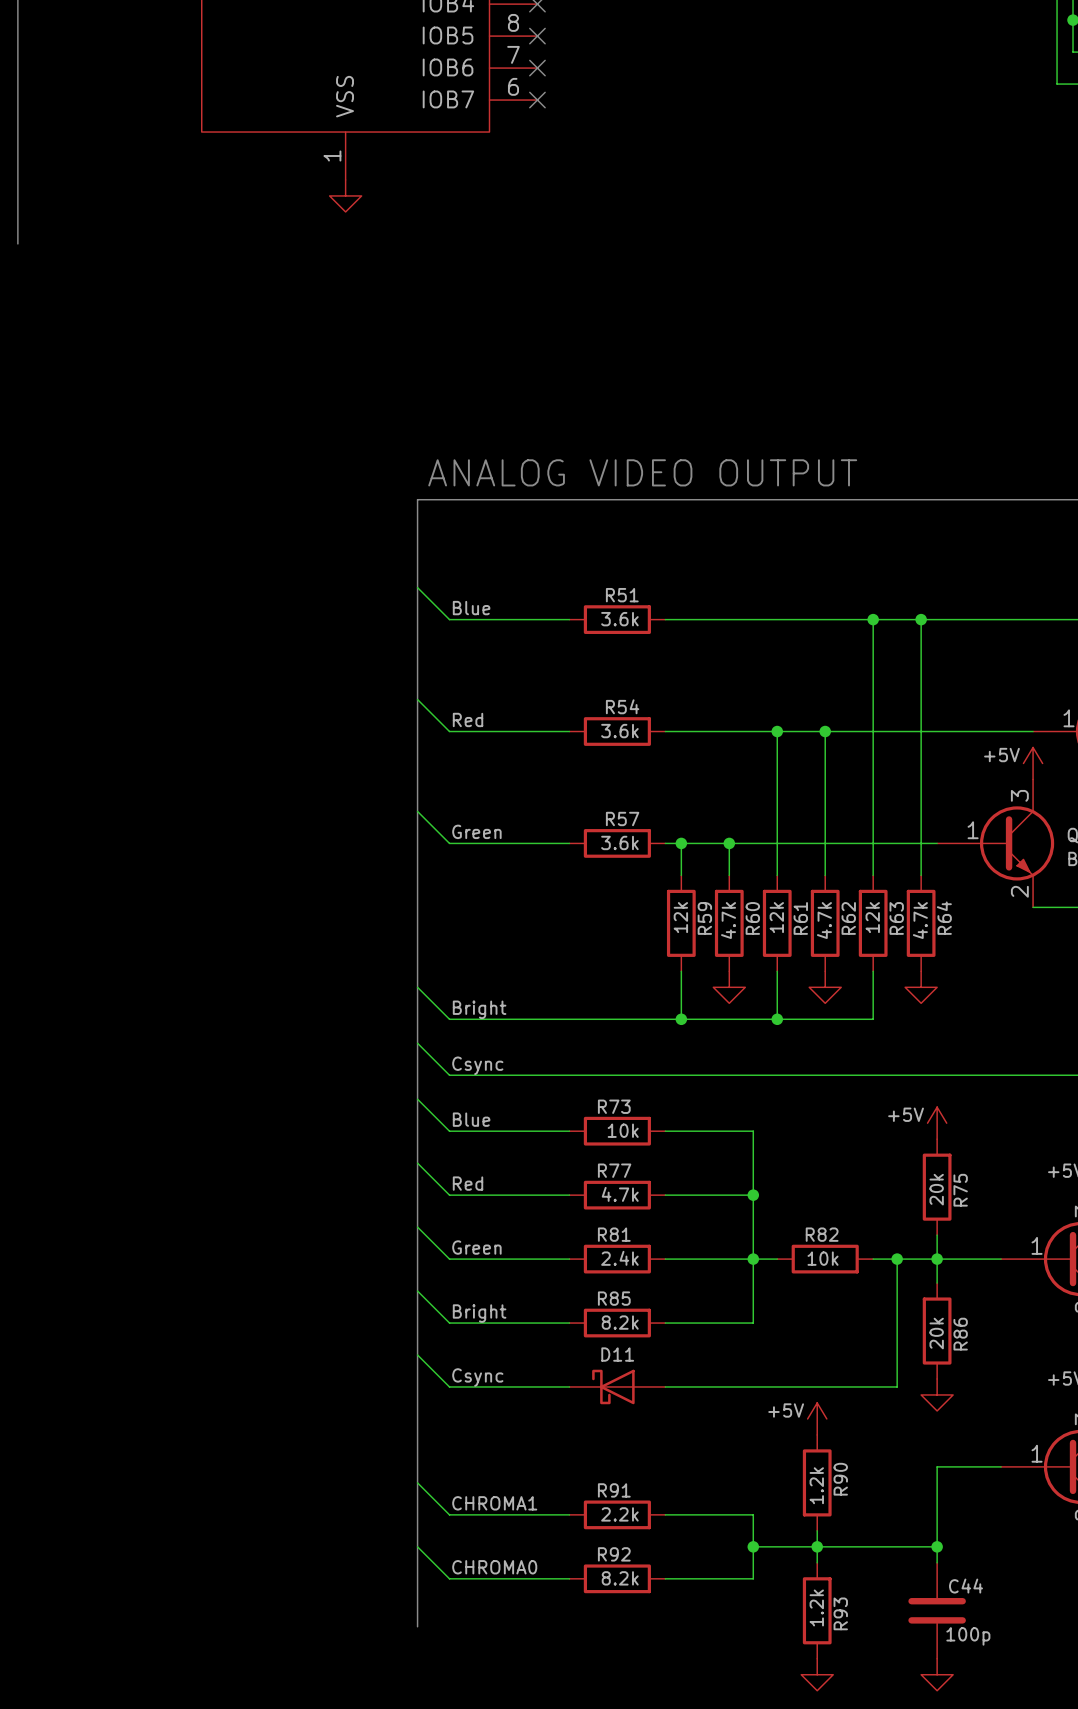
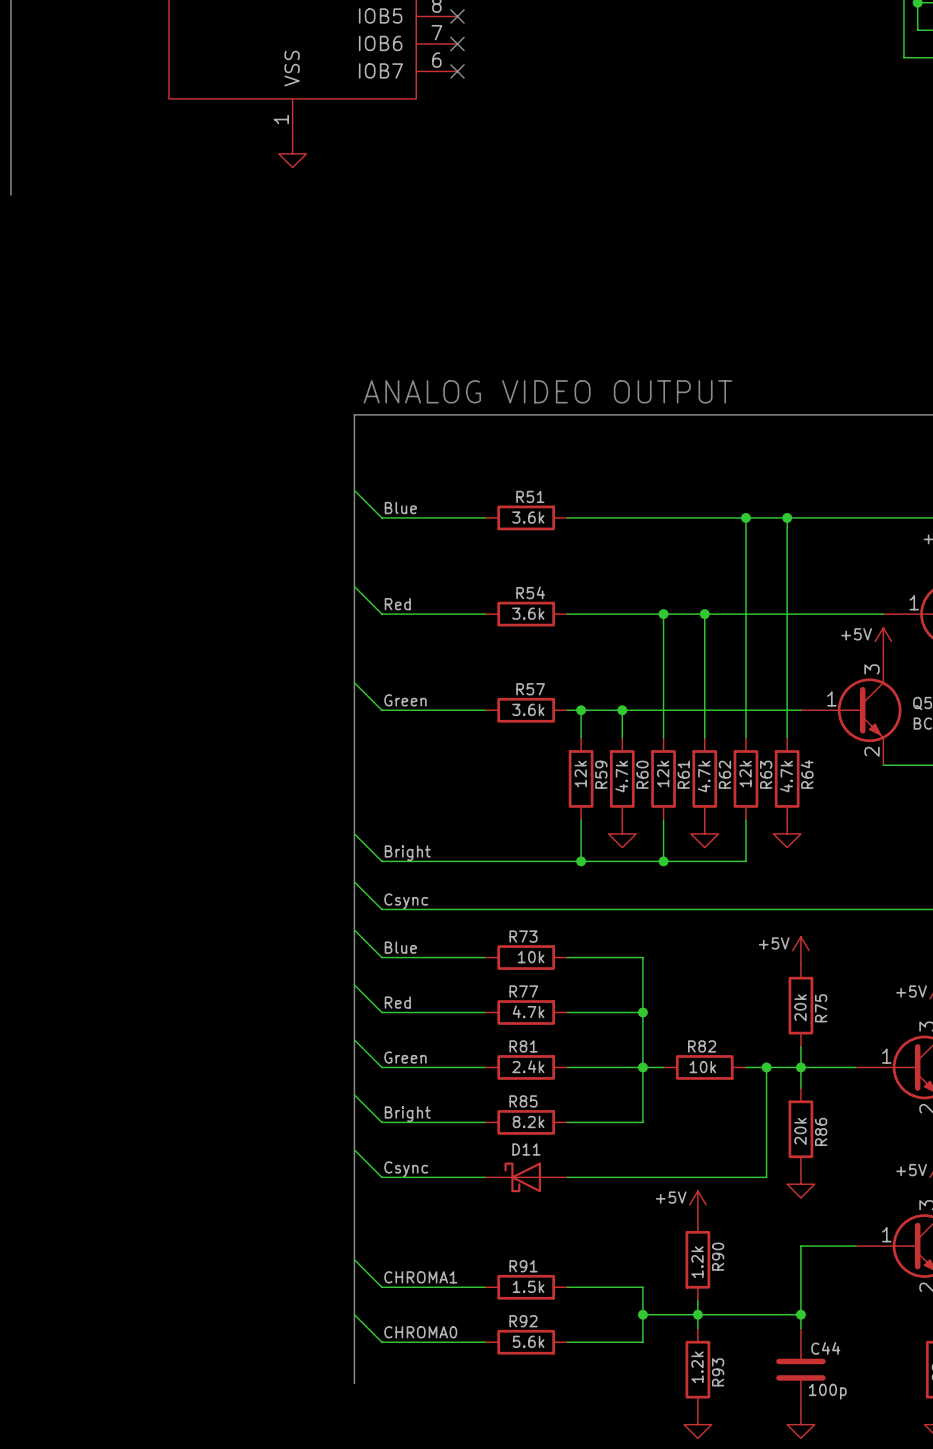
R91 value: 2.2k (619, 1514) -> 1.5k (528, 1286)
R92 value: 8.2k (620, 1578) -> 5.6k (528, 1341)

